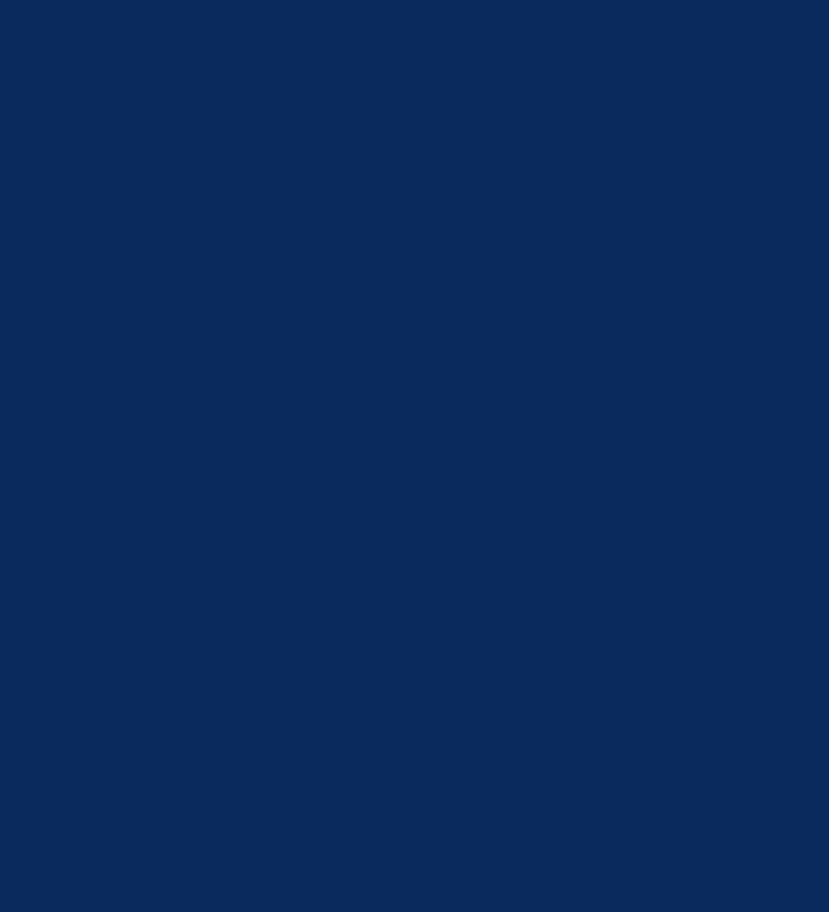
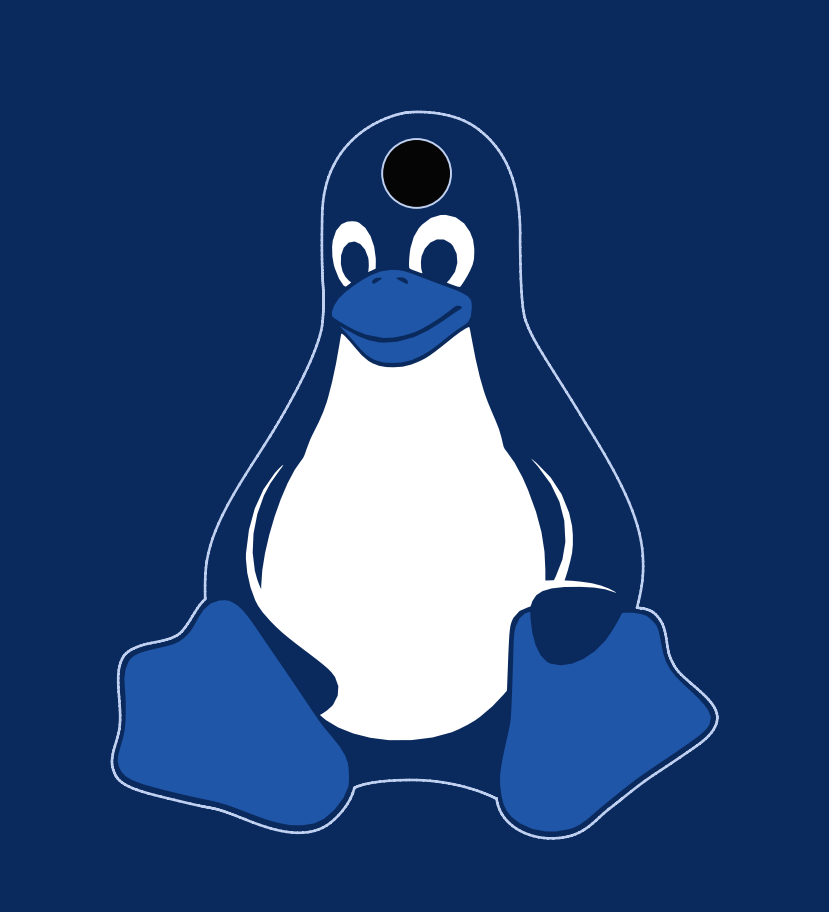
board edge: none -> (408, 112) (385, 118) (364, 129) (348, 144) (333, 166) (326, 182) (323, 201) (323, 311) (321, 330) (314, 350) (287, 406) (233, 494) (218, 523) (206, 560) (205, 599) (179, 633) (167, 639) (133, 648) (122, 659) (118, 674) (120, 715) (118, 733)
board edge: none -> (408, 112) (438, 113) (469, 123) (493, 143) (508, 167) (515, 189) (518, 209) (521, 291) (525, 320) (538, 347) (608, 462) (629, 502) (637, 525) (642, 548) (642, 575) (636, 607) (640, 608)
part: none -> (416, 173)
drawing: none -> [117, 214, 711, 832]
board edge: none -> (641, 608) (651, 611) (659, 619) (664, 630) (668, 653) (674, 666) (714, 707) (716, 721) (711, 732) (696, 745) (638, 786) (588, 826) (571, 835) (544, 837) (520, 830) (504, 817) (496, 798)
board edge: none -> (118, 733) (112, 758) (113, 769) (119, 780) (136, 789)
board edge: none -> (137, 789) (217, 809) (265, 826) (286, 831) (310, 831) (330, 822)
board edge: none -> (495, 798) (469, 788) (442, 782) (409, 779) (375, 782) (354, 787) (345, 806) (330, 822)

